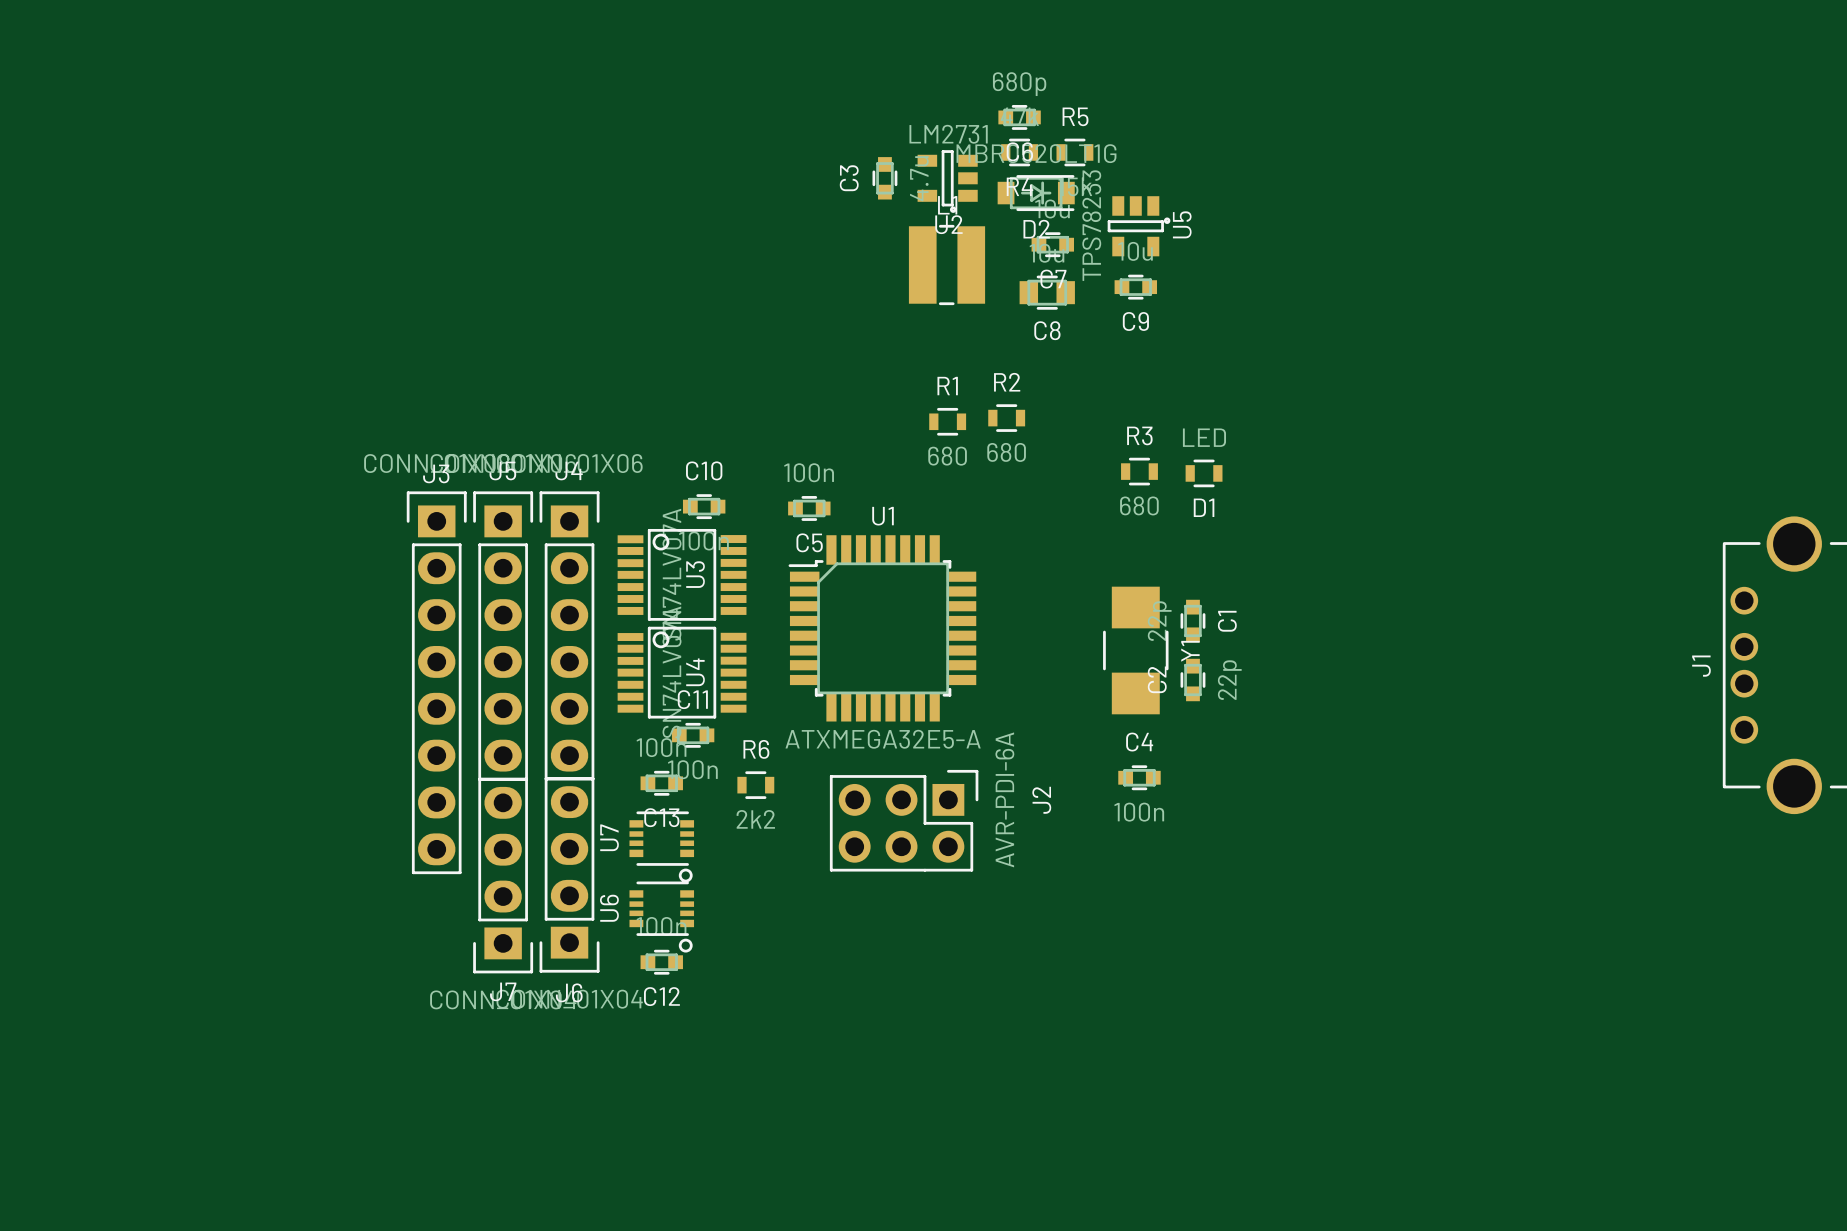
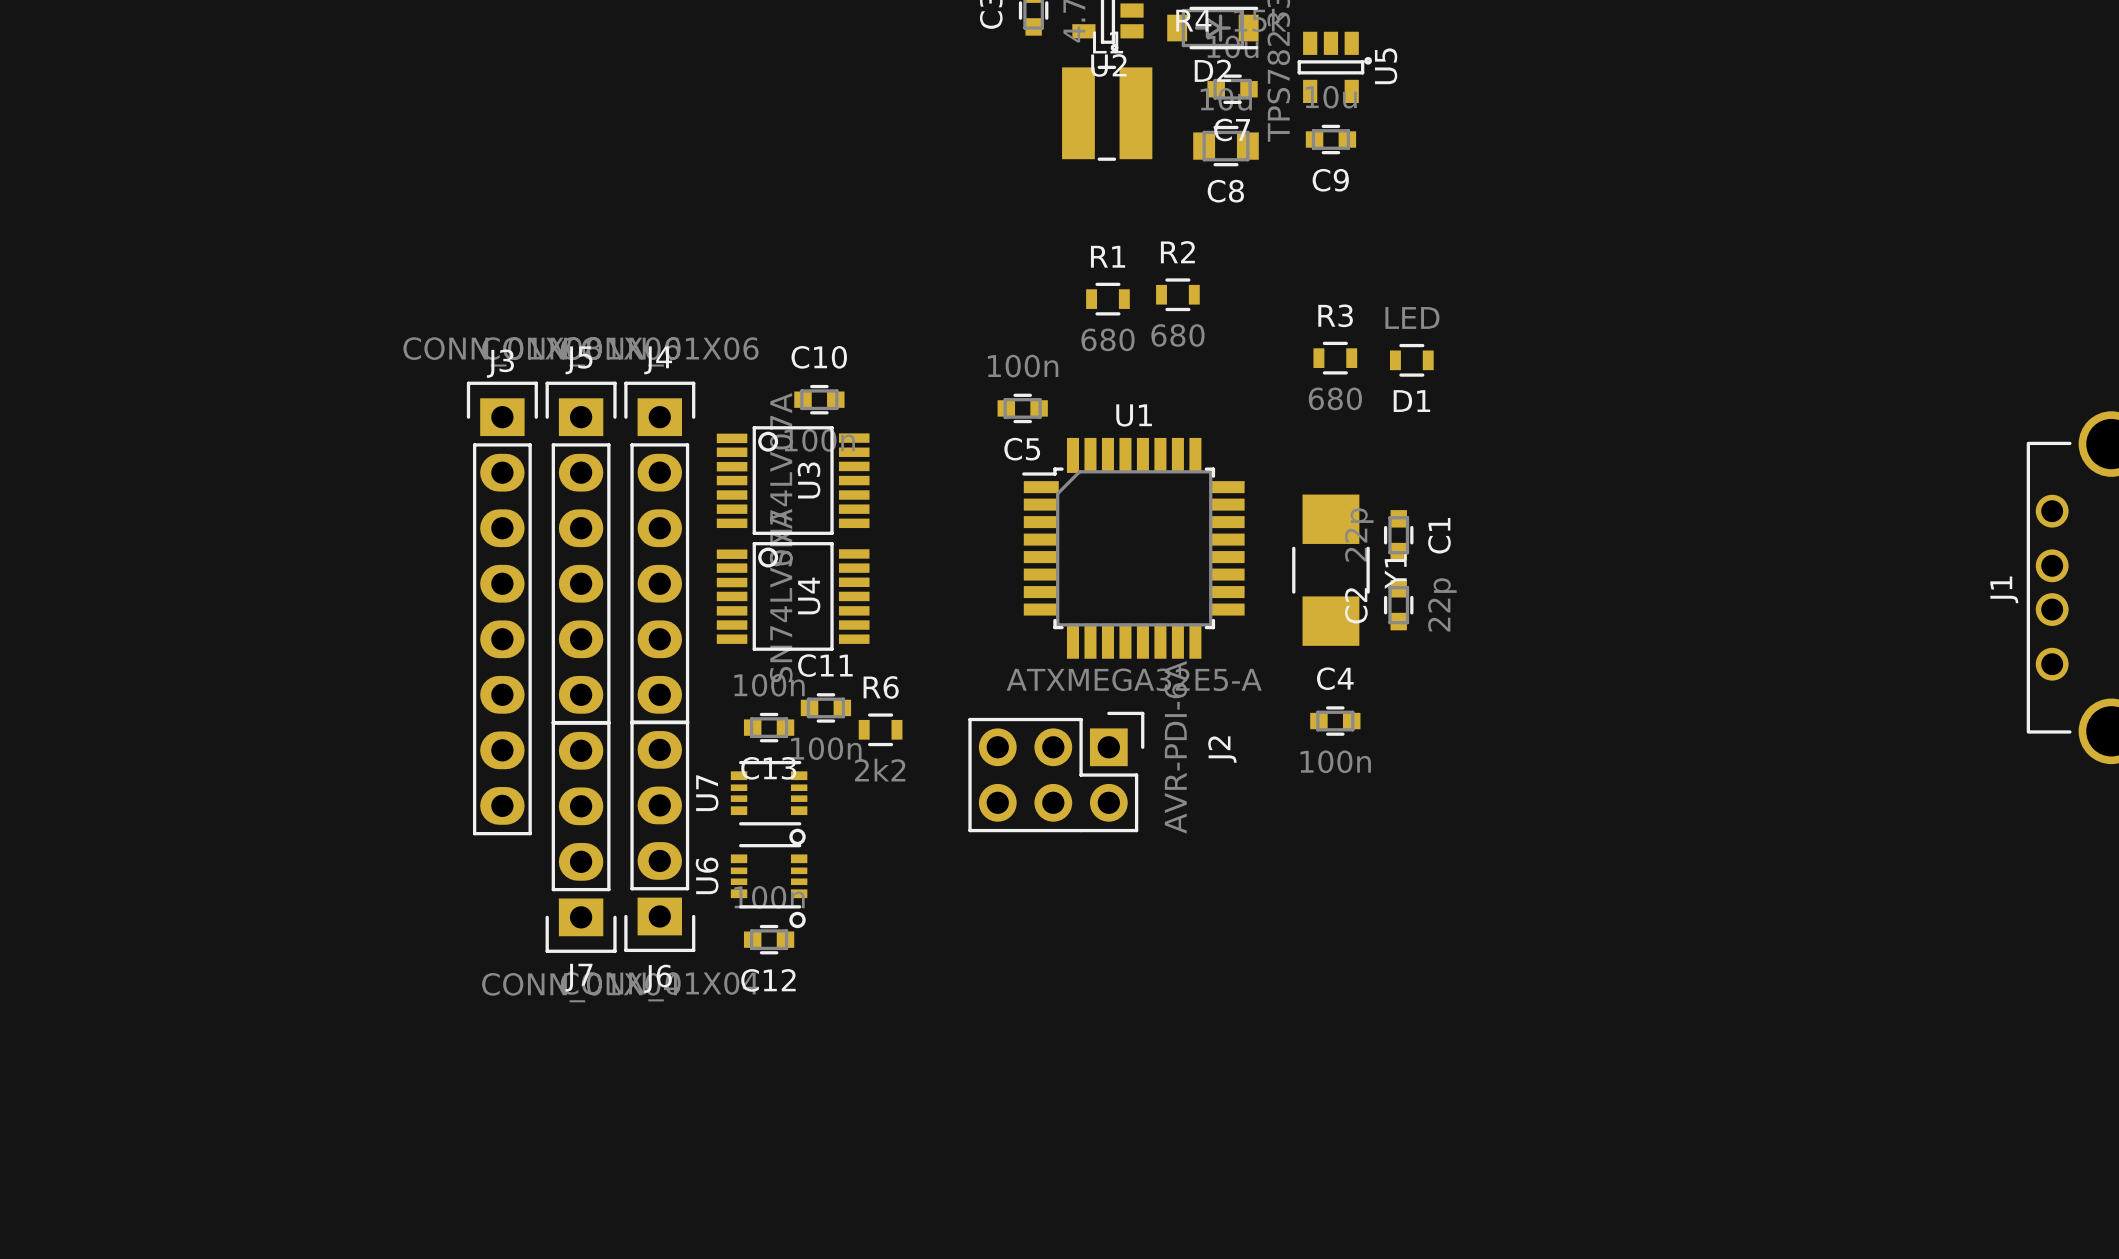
C5 position: (809, 508) -> (1022, 408)
U1 position: (882, 628) -> (1133, 548)
C11 position: (693, 735) -> (825, 707)

